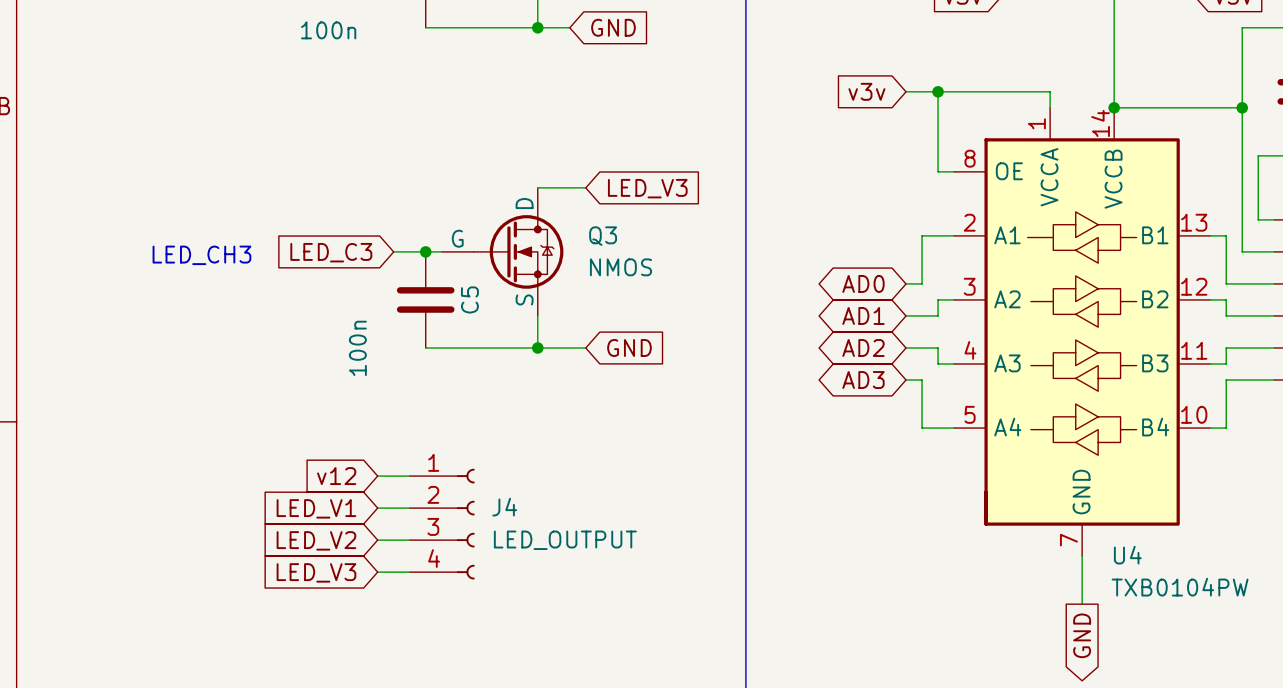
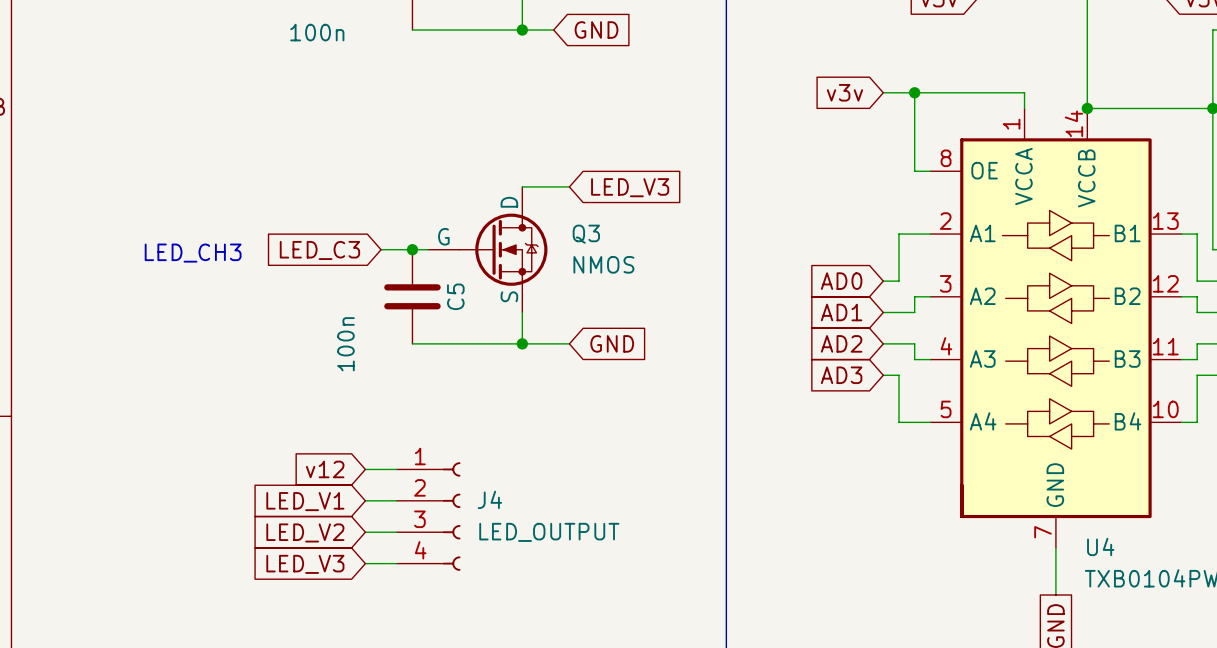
global label shape: bidirectional (863, 283) -> input (841, 281)
global label shape: bidirectional (863, 315) -> input (841, 312)
global label shape: bidirectional (863, 347) -> input (841, 343)
global label shape: bidirectional (863, 380) -> input (841, 375)

